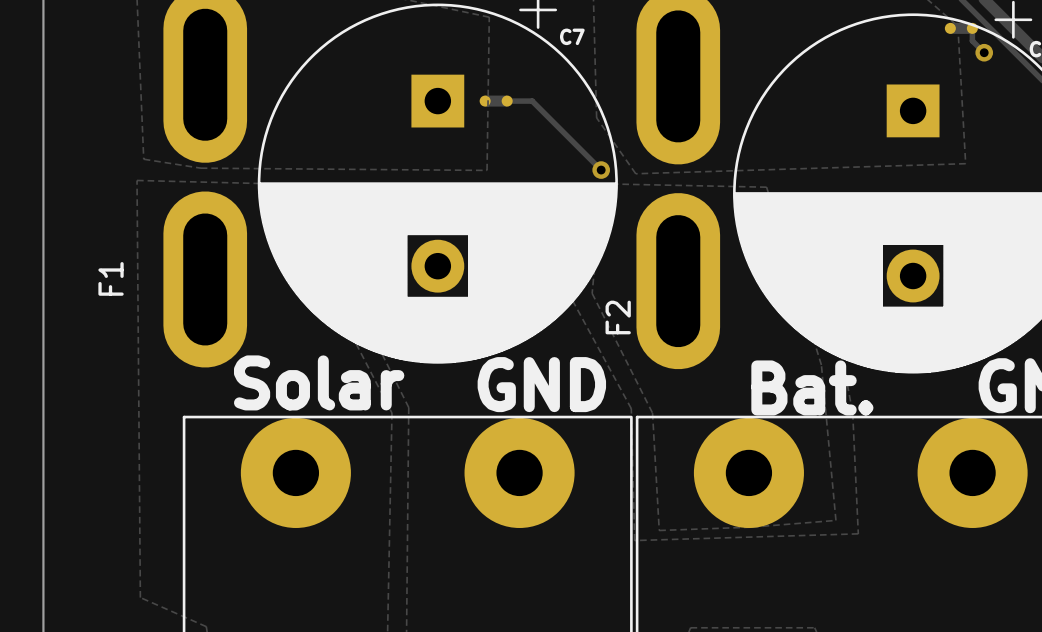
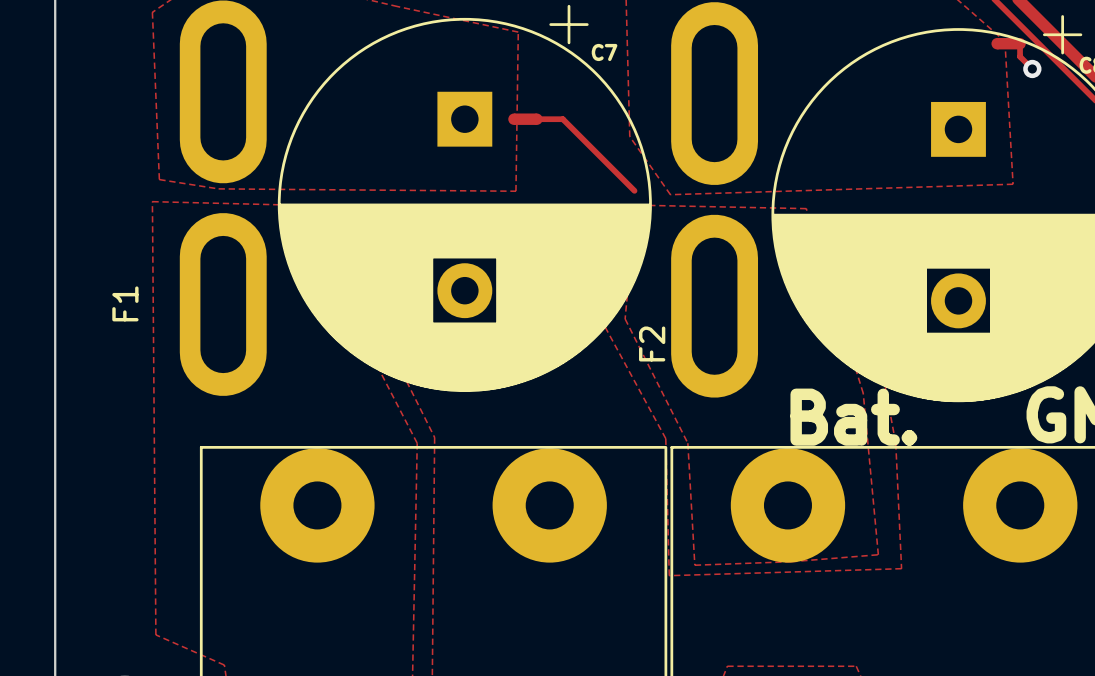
via: (601, 170) -> none
text: Solar (319, 382) -> none
text: GND (541, 384) -> none

